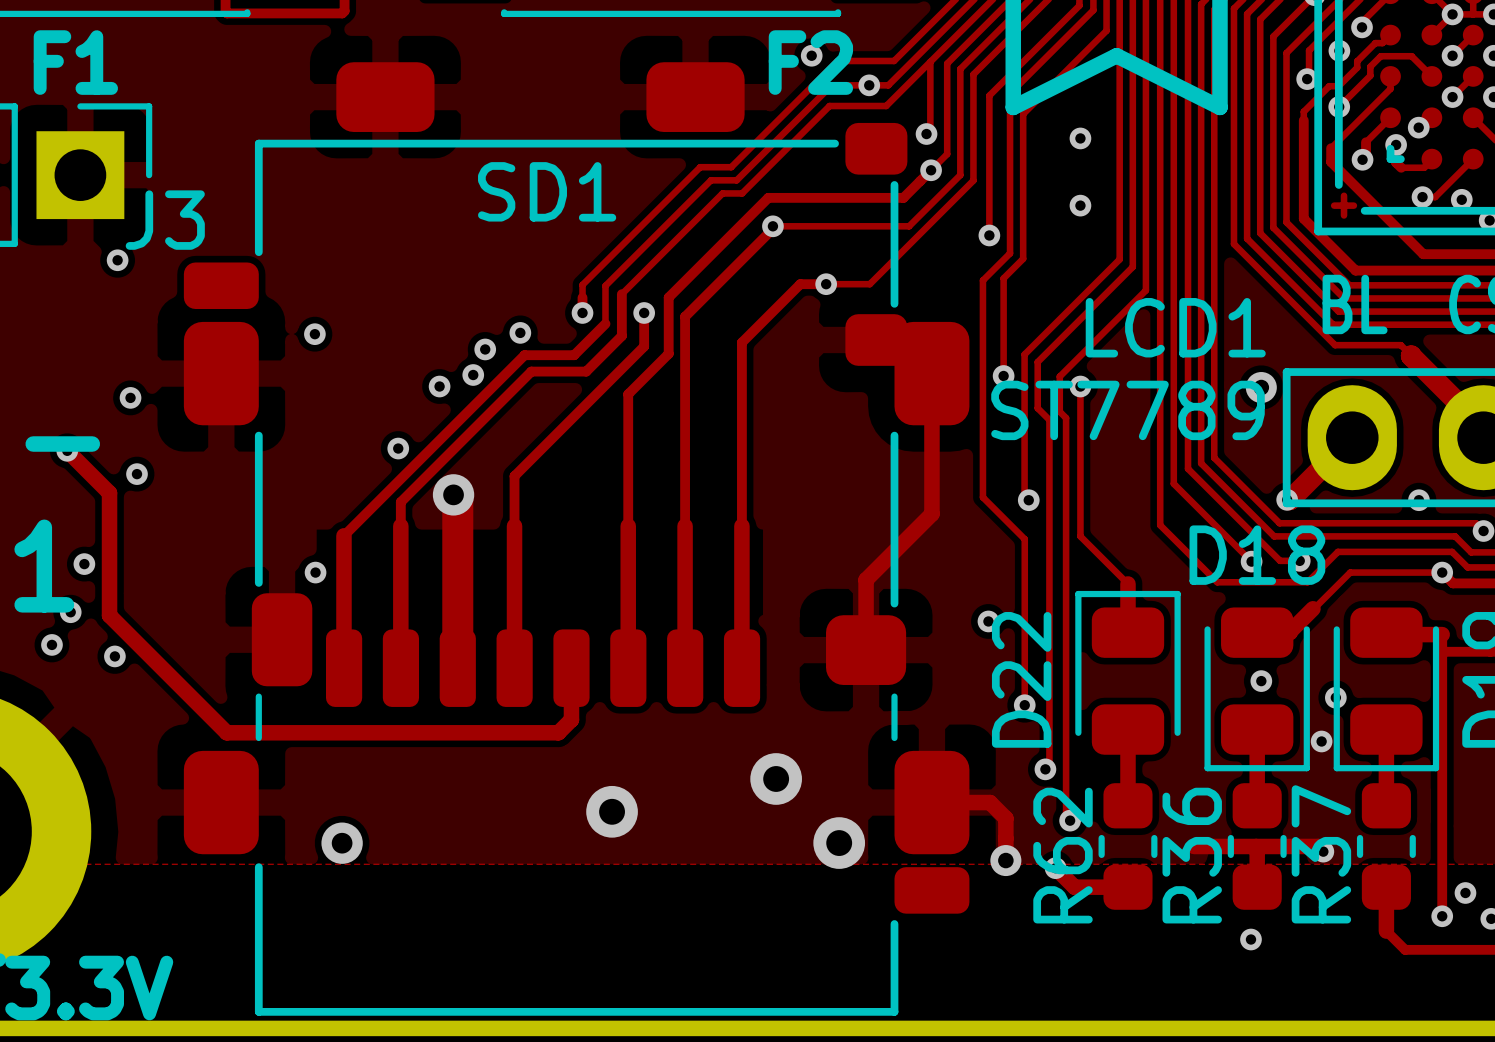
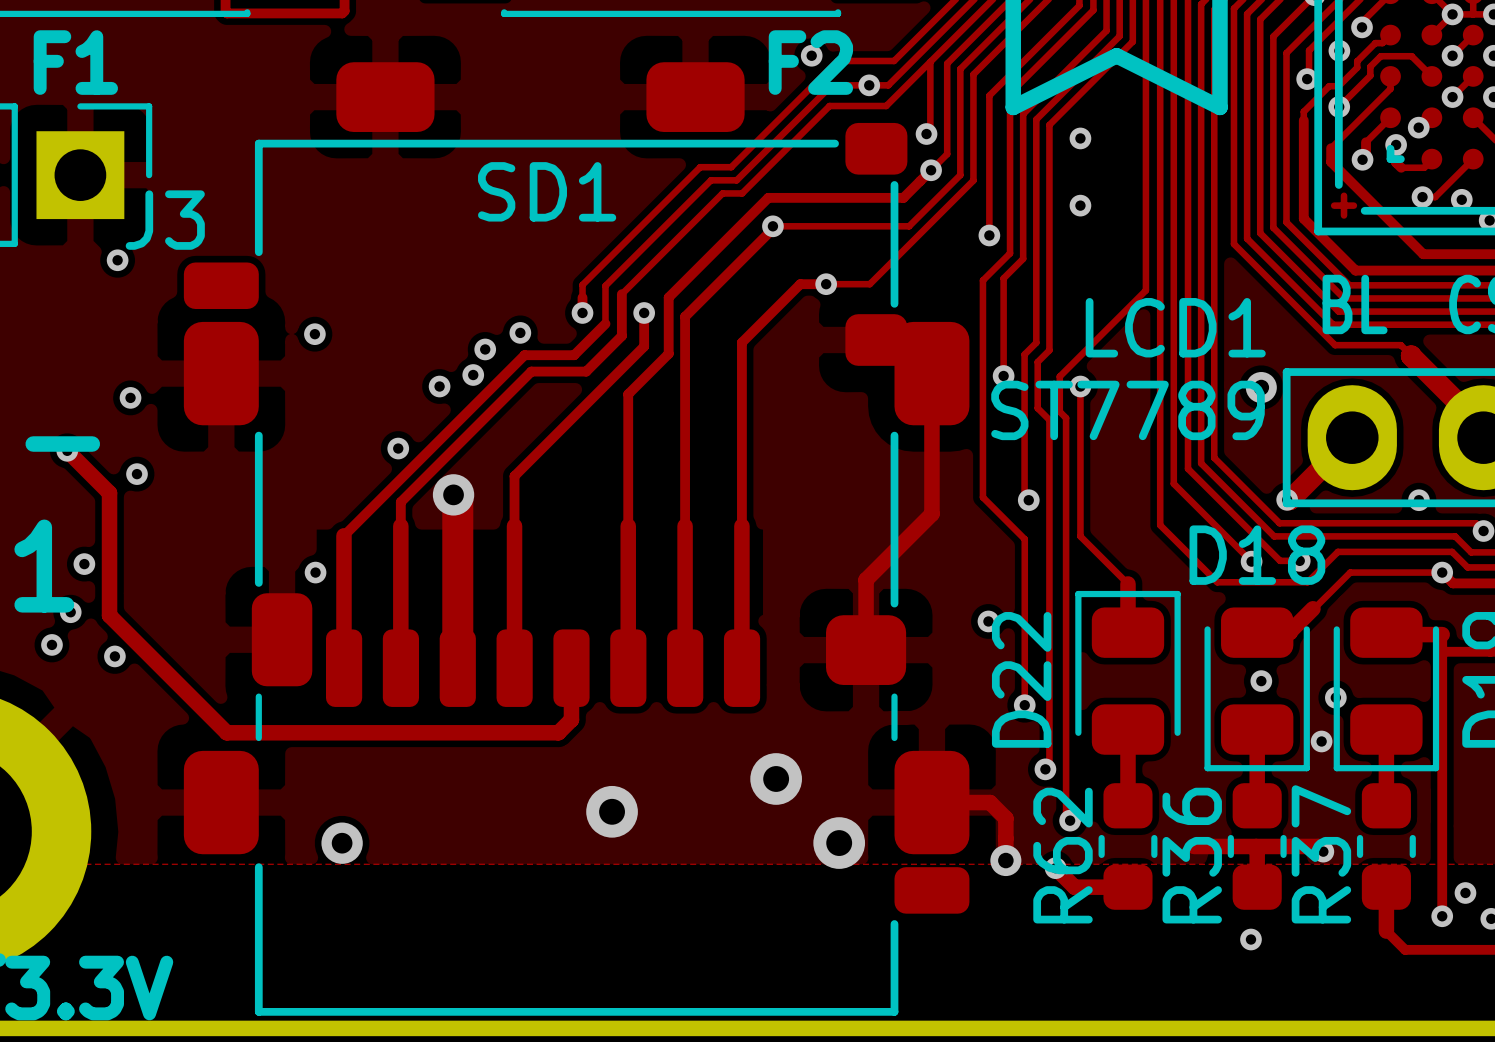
track: (1119, 36) (1119, 259) (1036, 342) -> (1119, 36) (1036, 119) (1036, 342)
track: (1132, 41) (1132, 266) (1049, 350) -> (1132, 41) (1049, 125) (1049, 350)

